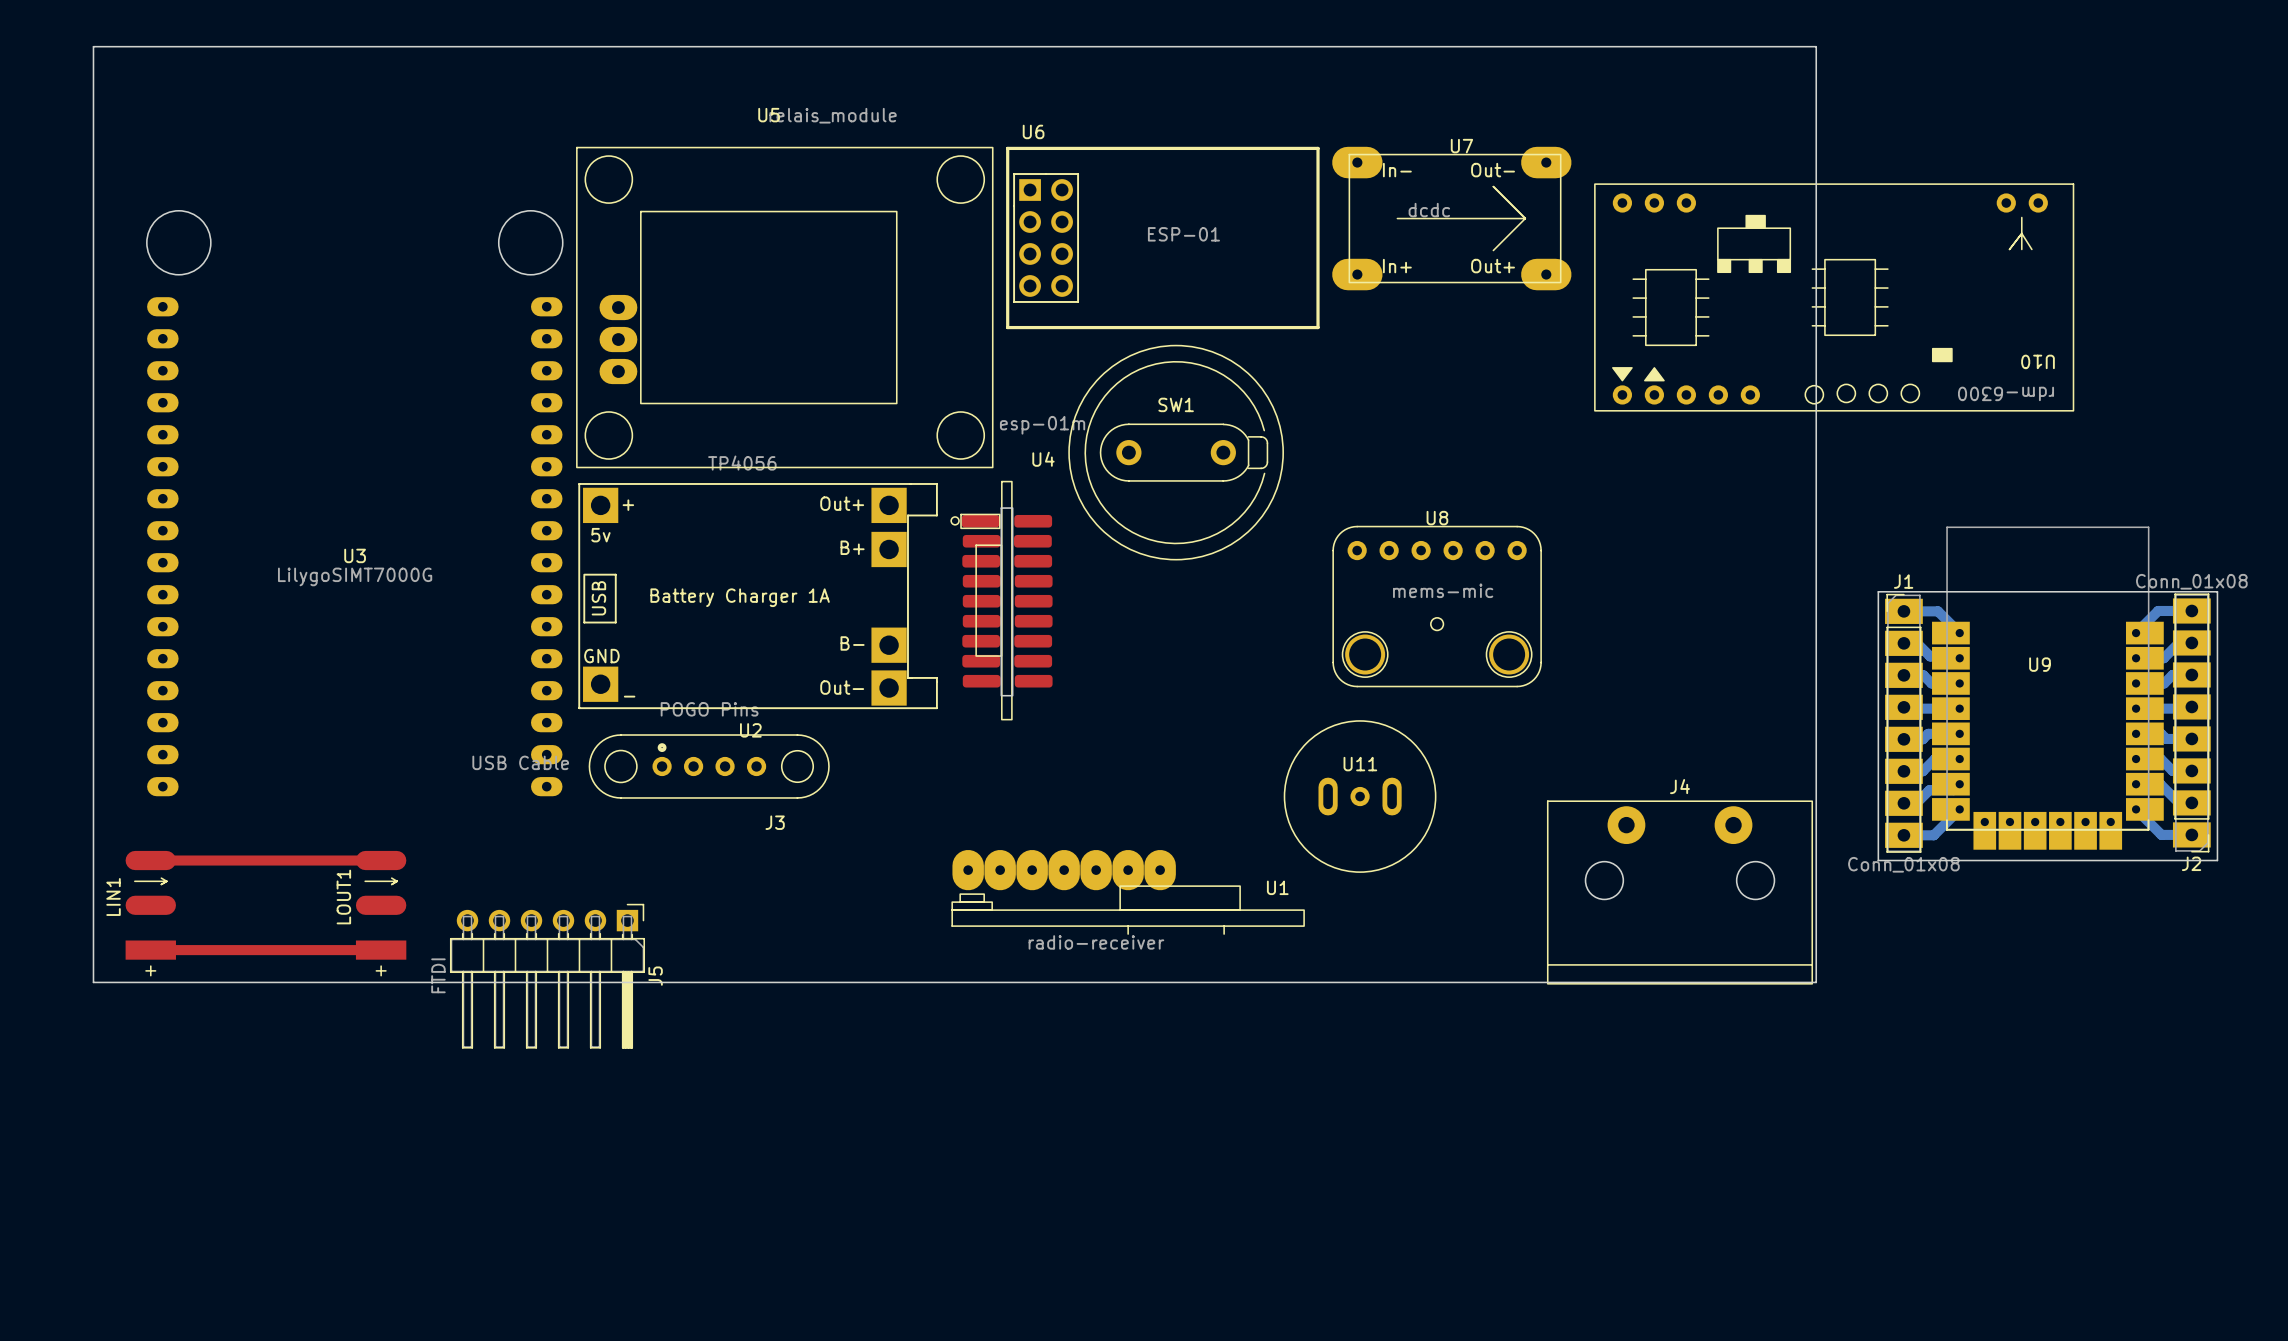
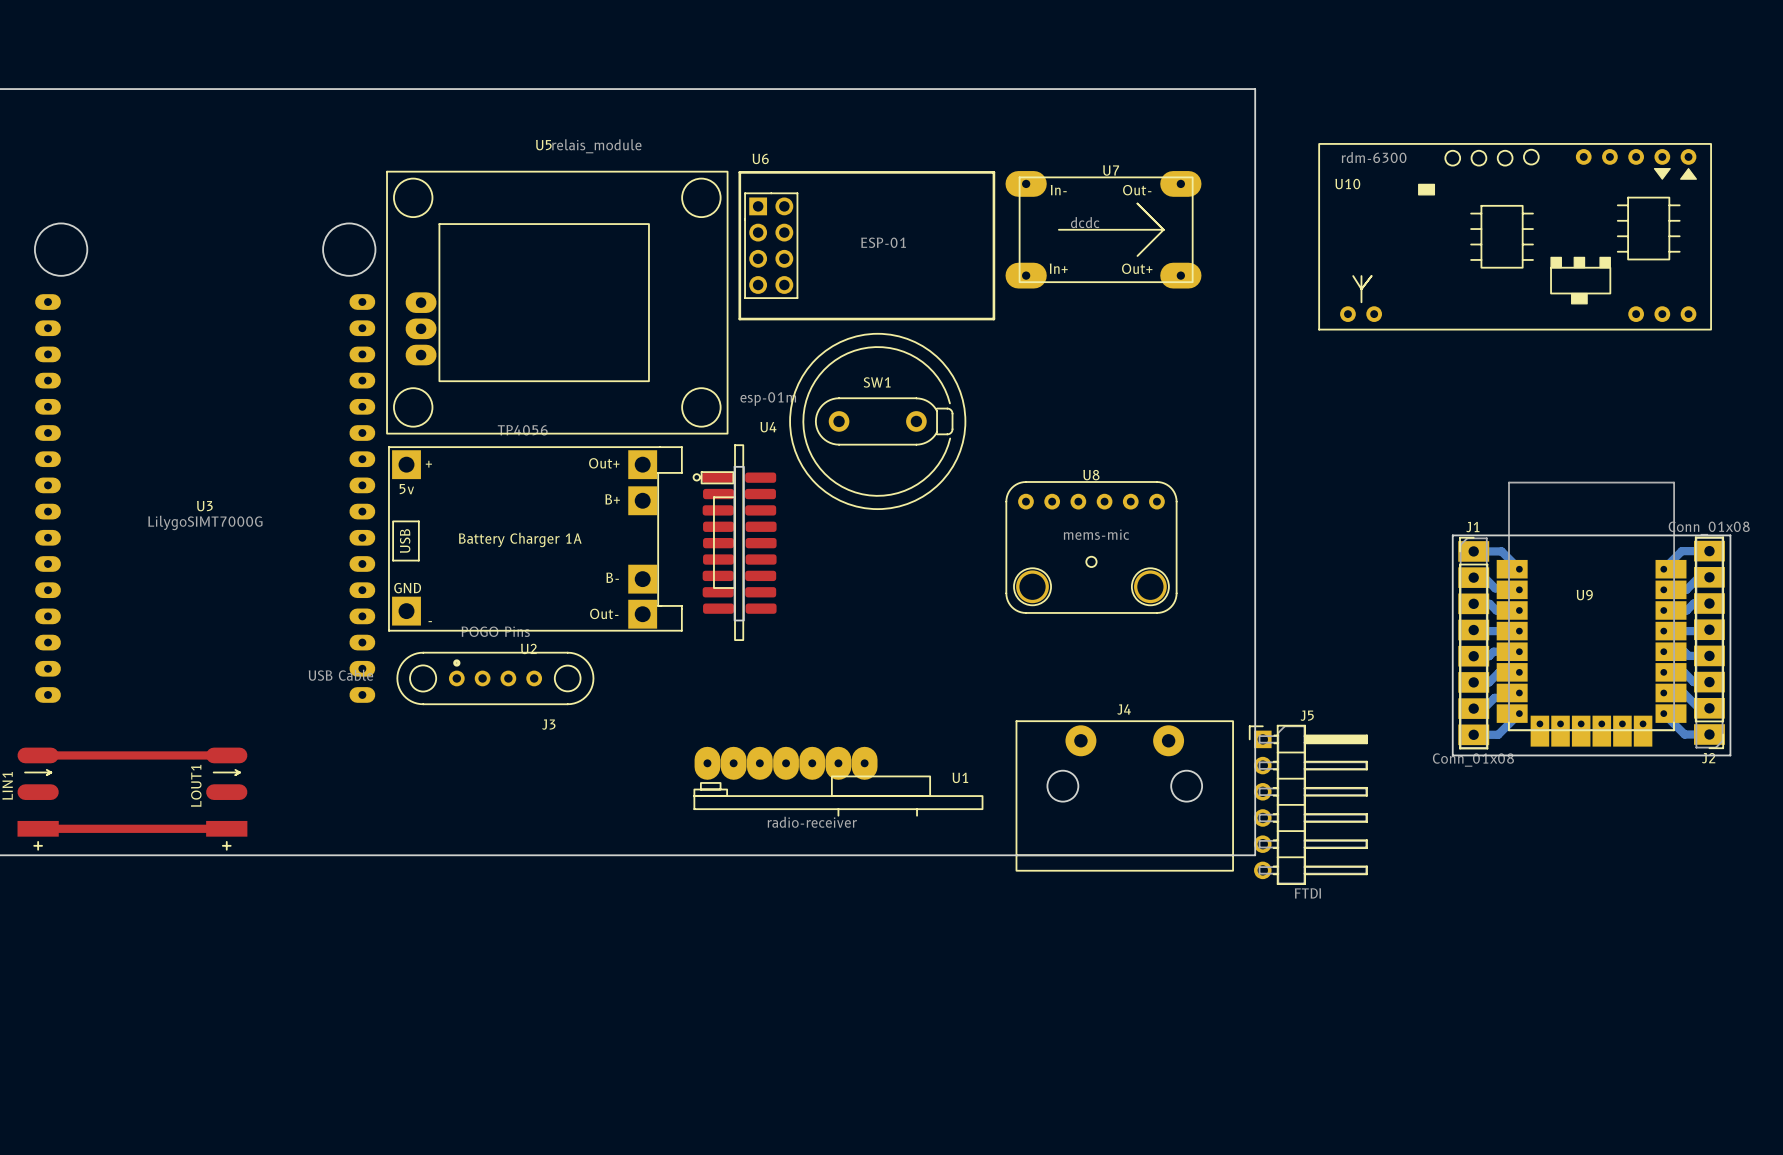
board edge: (1637, 46) (1816, 46) (1816, 982) (1637, 982) -> (1255, 89) (1255, 855)
U10 rotation: 0° (1834, 297) -> 180° (1515, 236)
U11: (1360, 796) -> none
J4 position: (1679, 892) -> (1124, 795)
J5 rotation: 0° (547, 976) -> 90° counterclockwise (1308, 804)
J5 position: (547, 976) -> (1308, 804)

